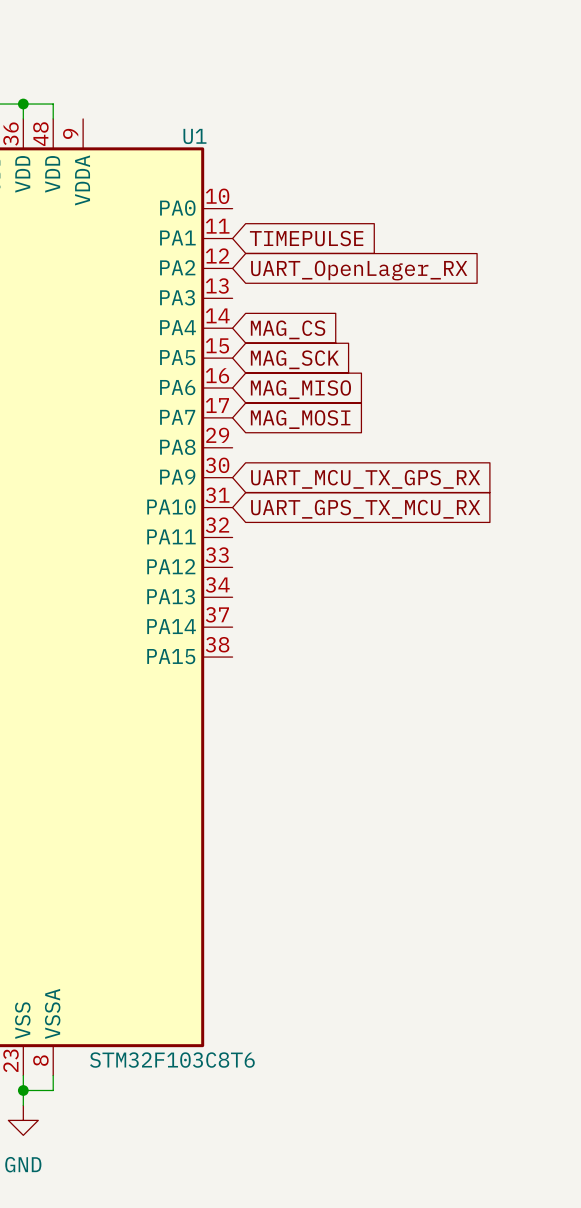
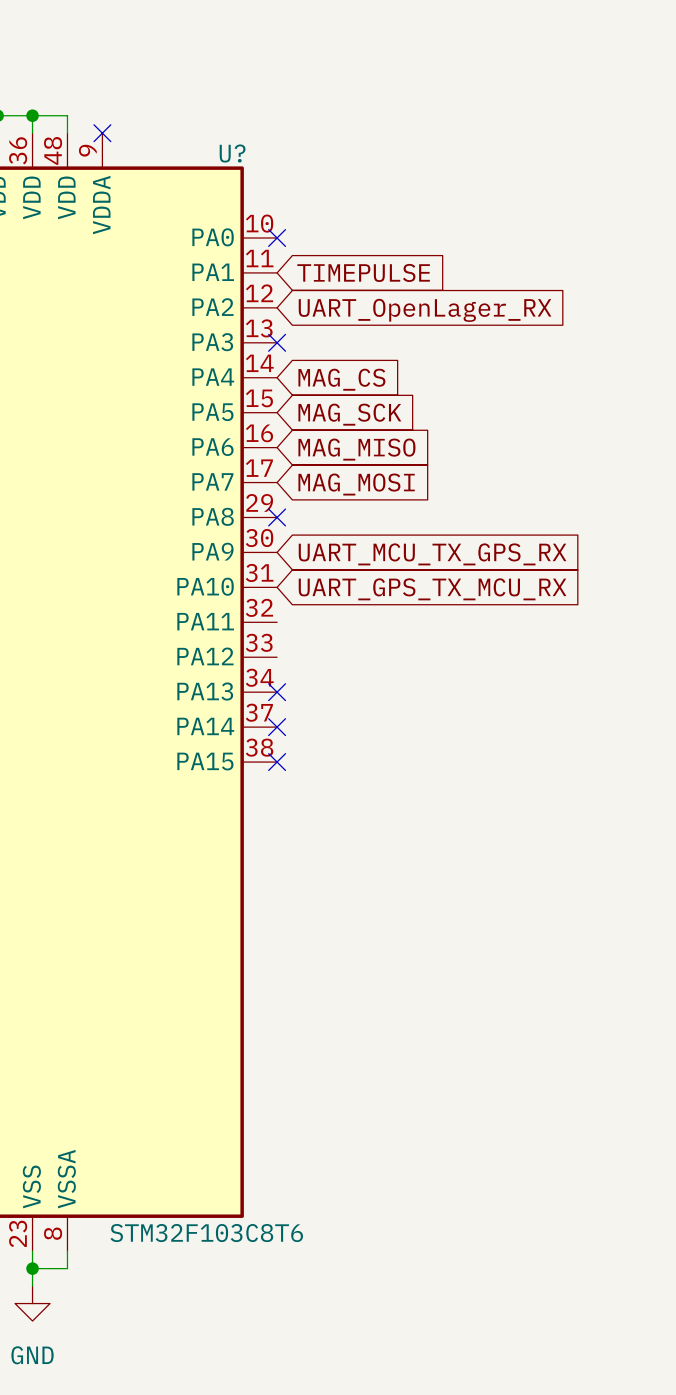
no-connect mark: none -> (102, 133)
U1 name: U1 (194, 136) -> U? (232, 153)
no-connect mark: none -> (277, 238)
no-connect mark: none -> (277, 342)
no-connect mark: none -> (277, 517)
no-connect mark: none -> (277, 692)
no-connect mark: none -> (277, 727)
no-connect mark: none -> (277, 762)

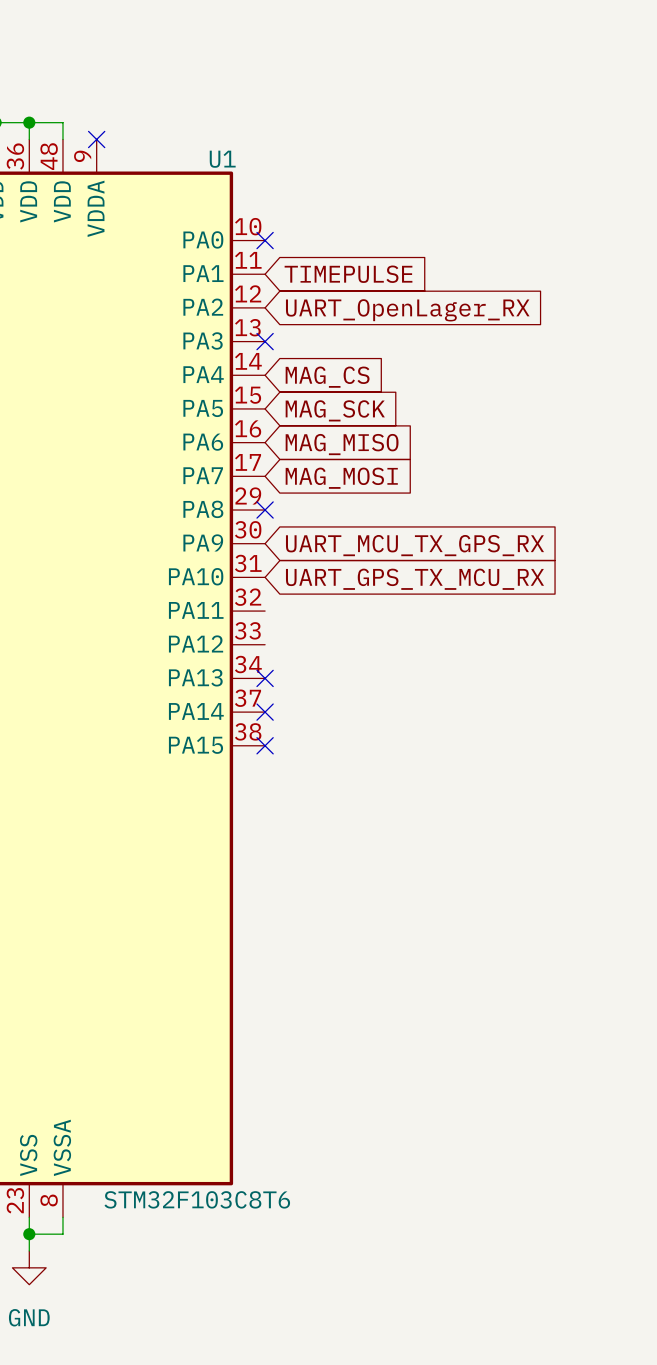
U? name: U? (232, 153) -> U1 (222, 159)

